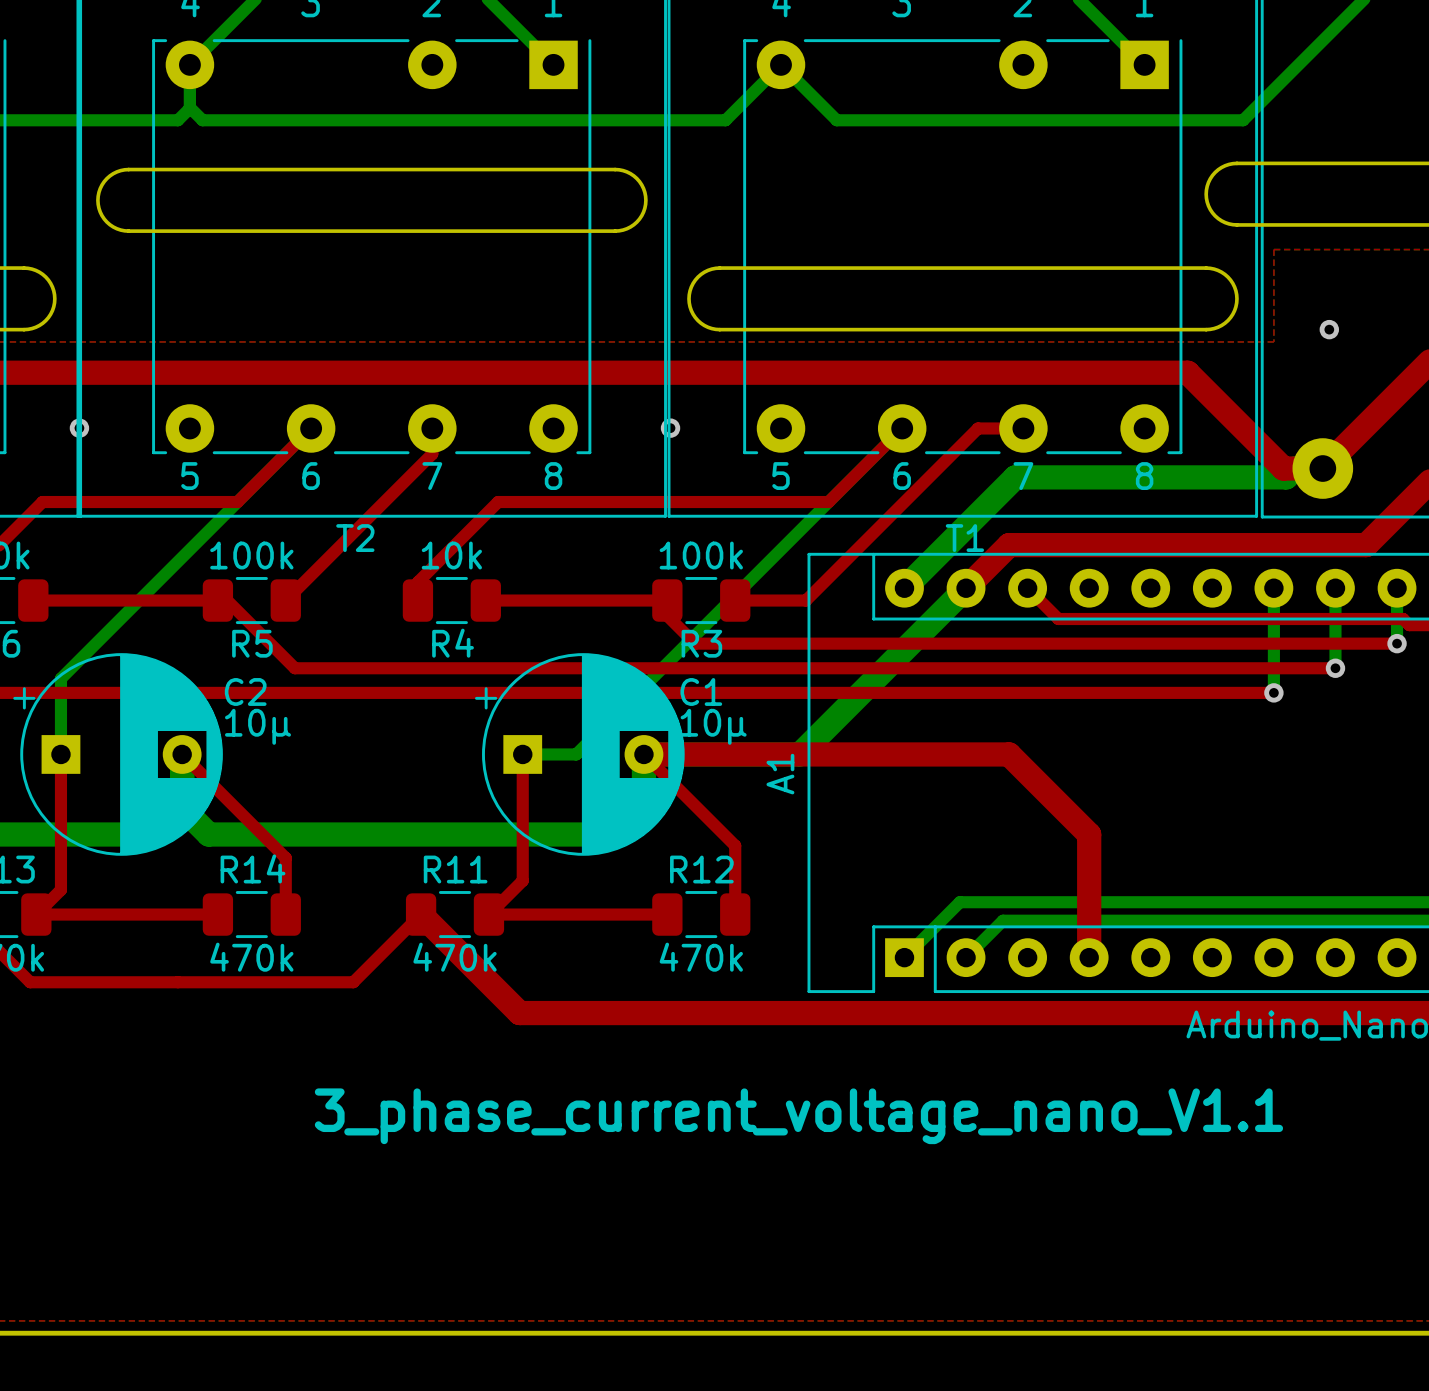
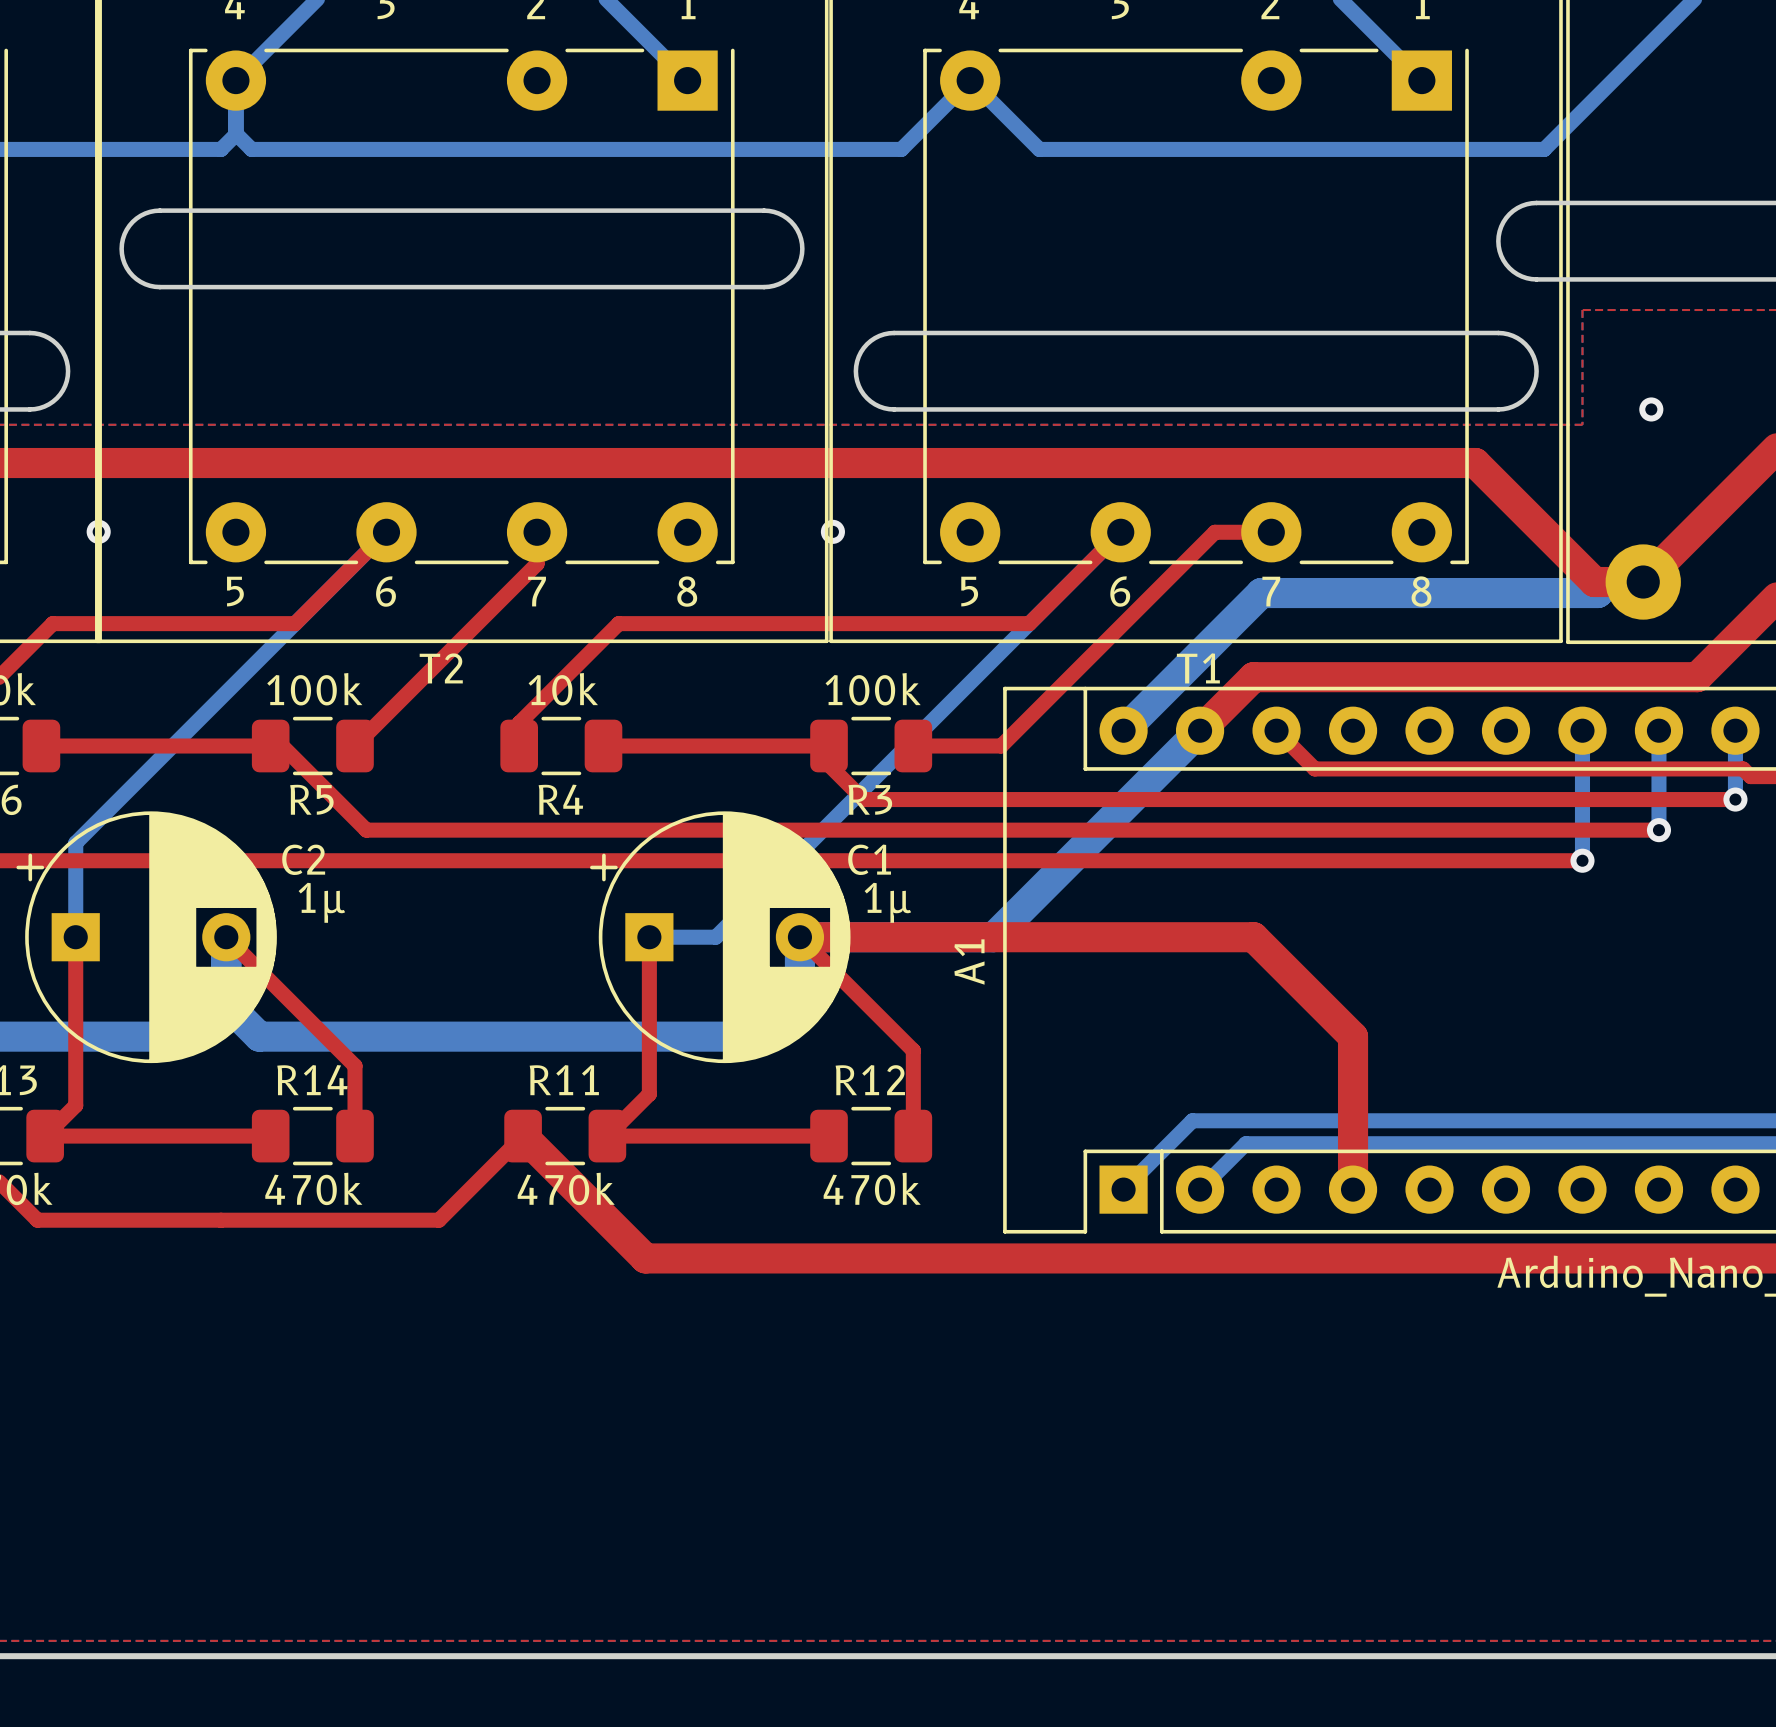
C2 value: 10µ (257, 726) -> 1µ (321, 902)
C1 value: 10µ (713, 726) -> 1µ (887, 902)
text: 3_phase_current_voltage_nano_V1.1 (798, 1116) -> none

